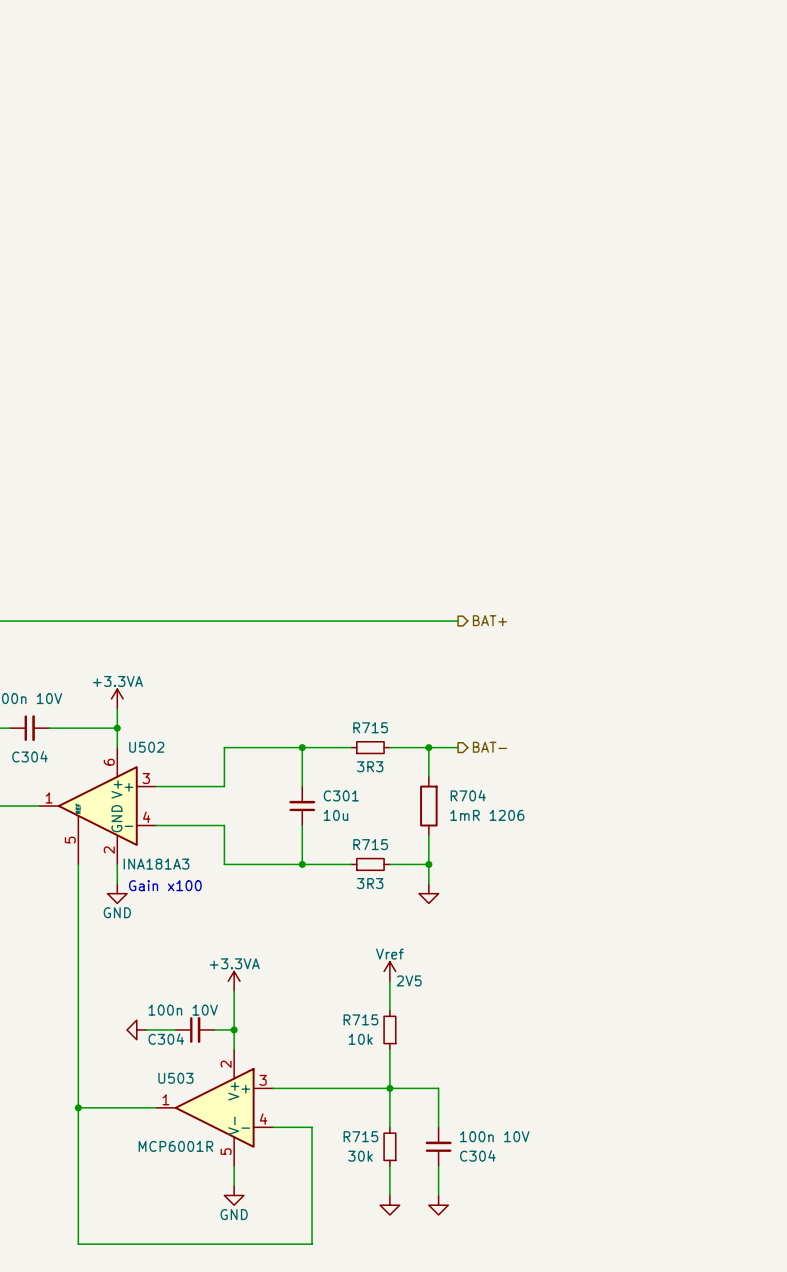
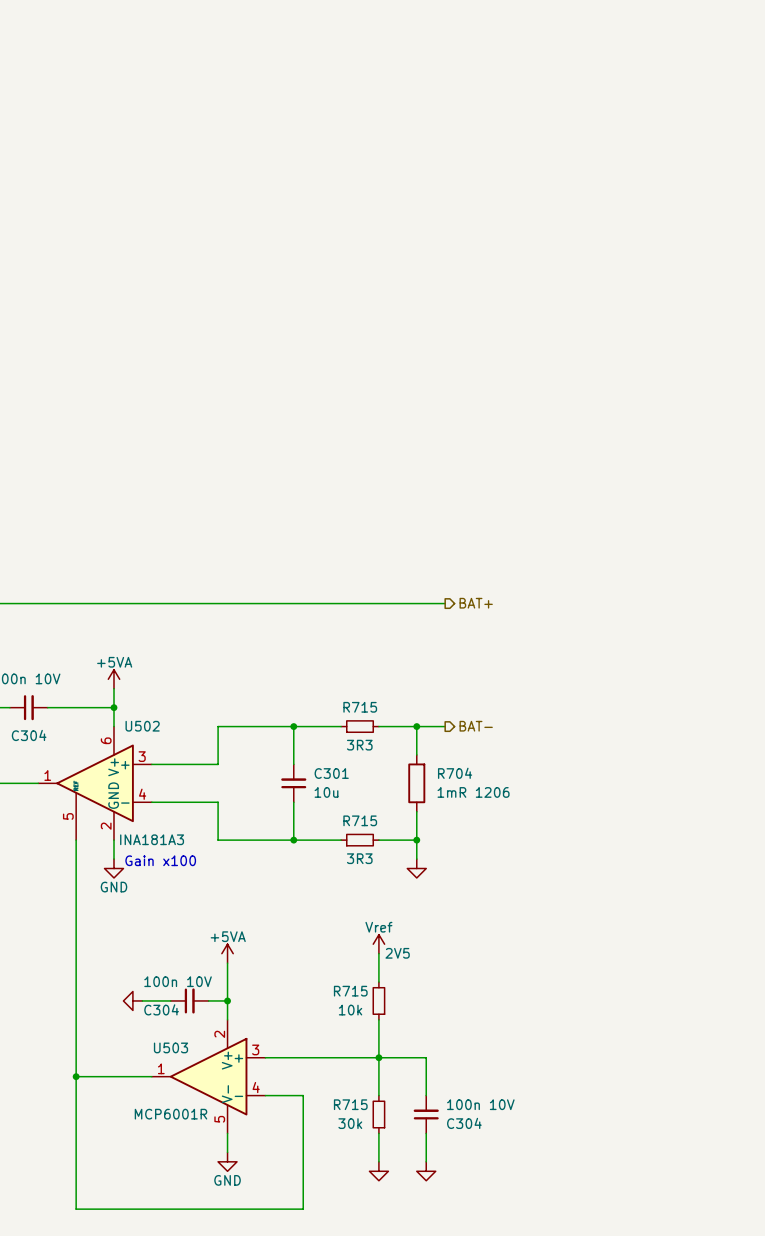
power symbol: +3.3VA (117, 698) -> +5VA (113, 679)
power symbol: +3.3VA (234, 981) -> +5VA (227, 953)

